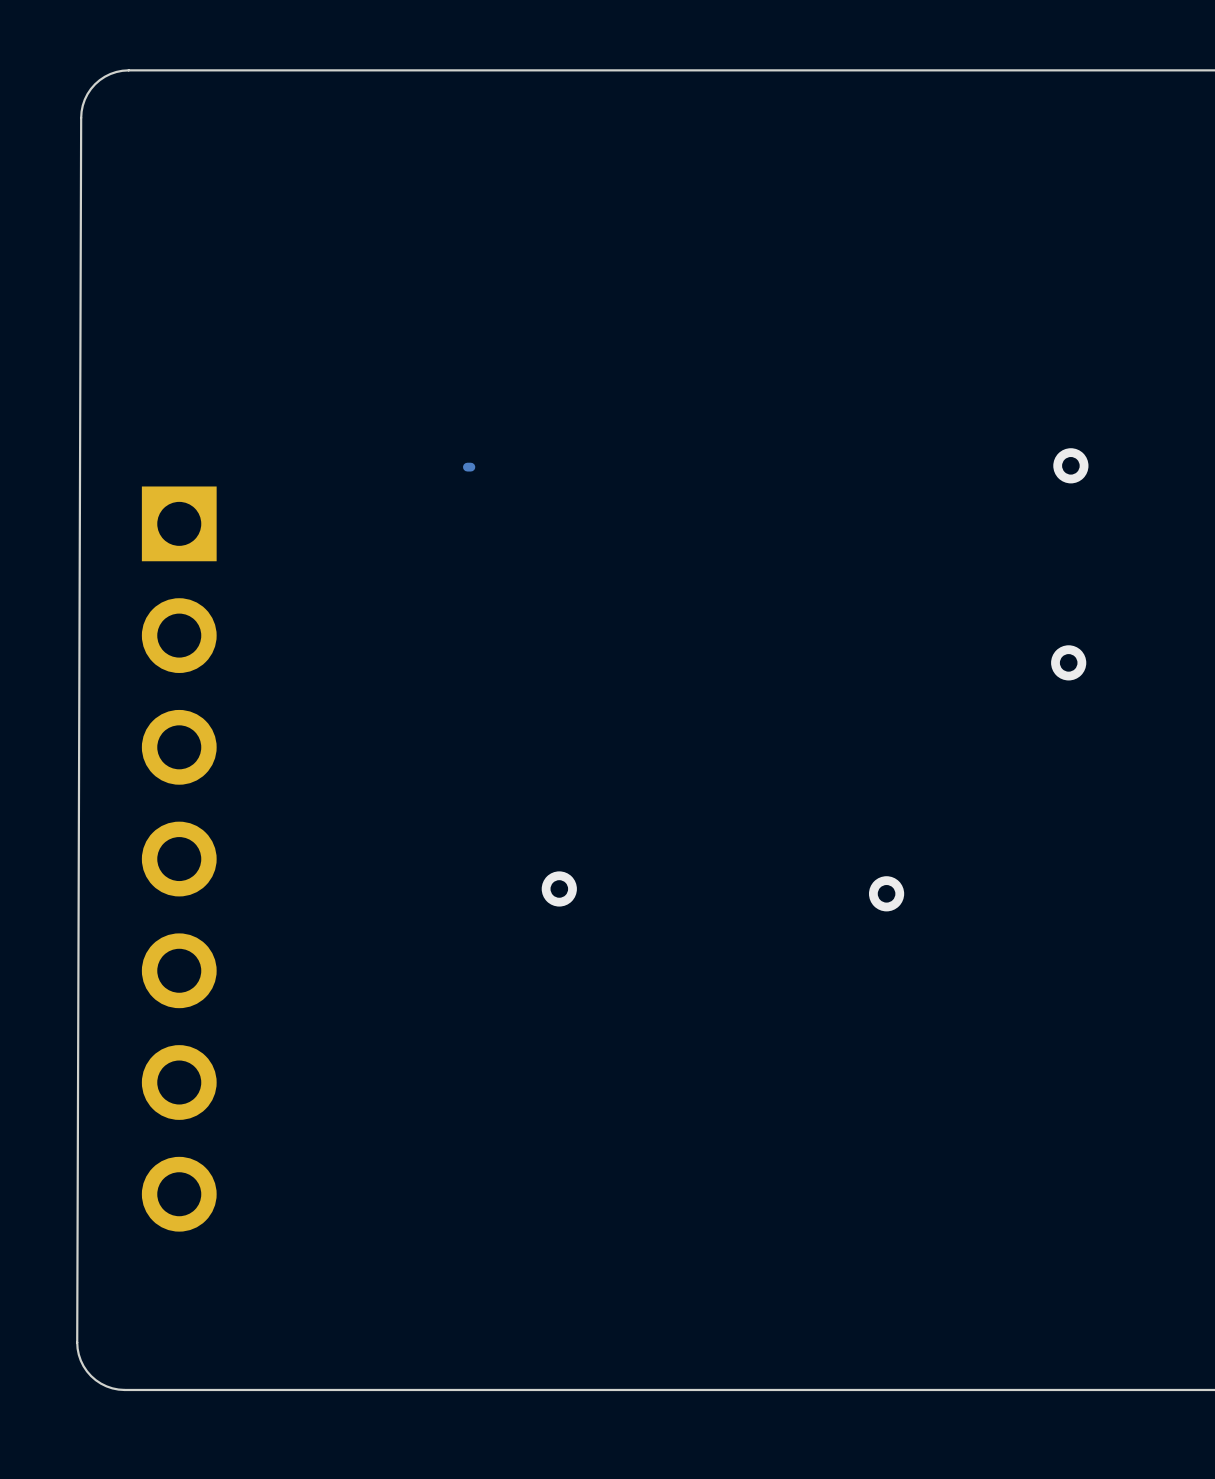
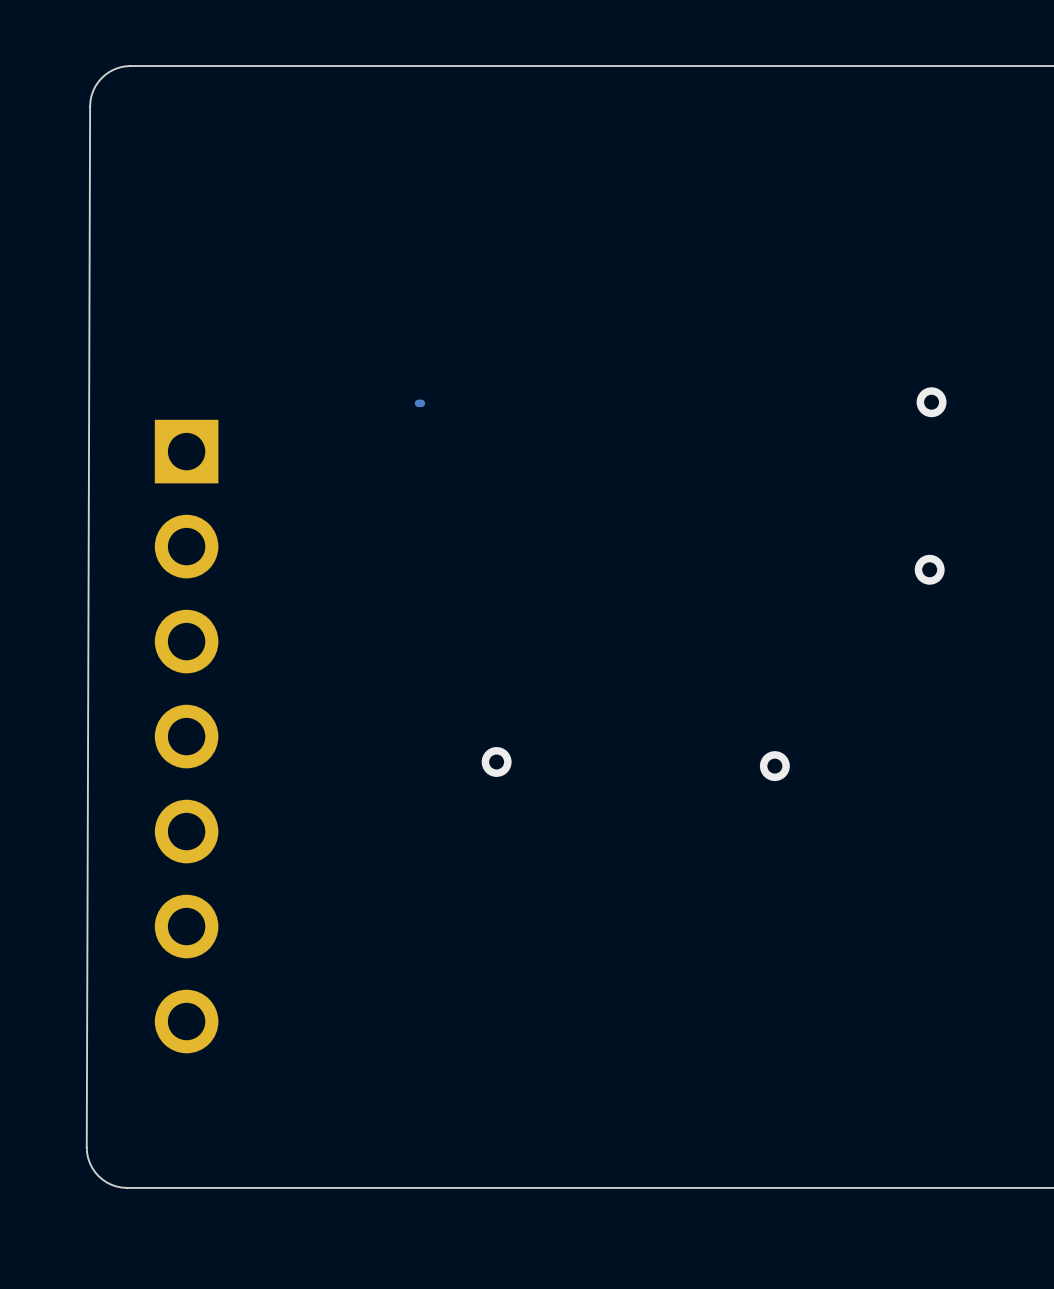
part position: (179, 859) -> (186, 736)

